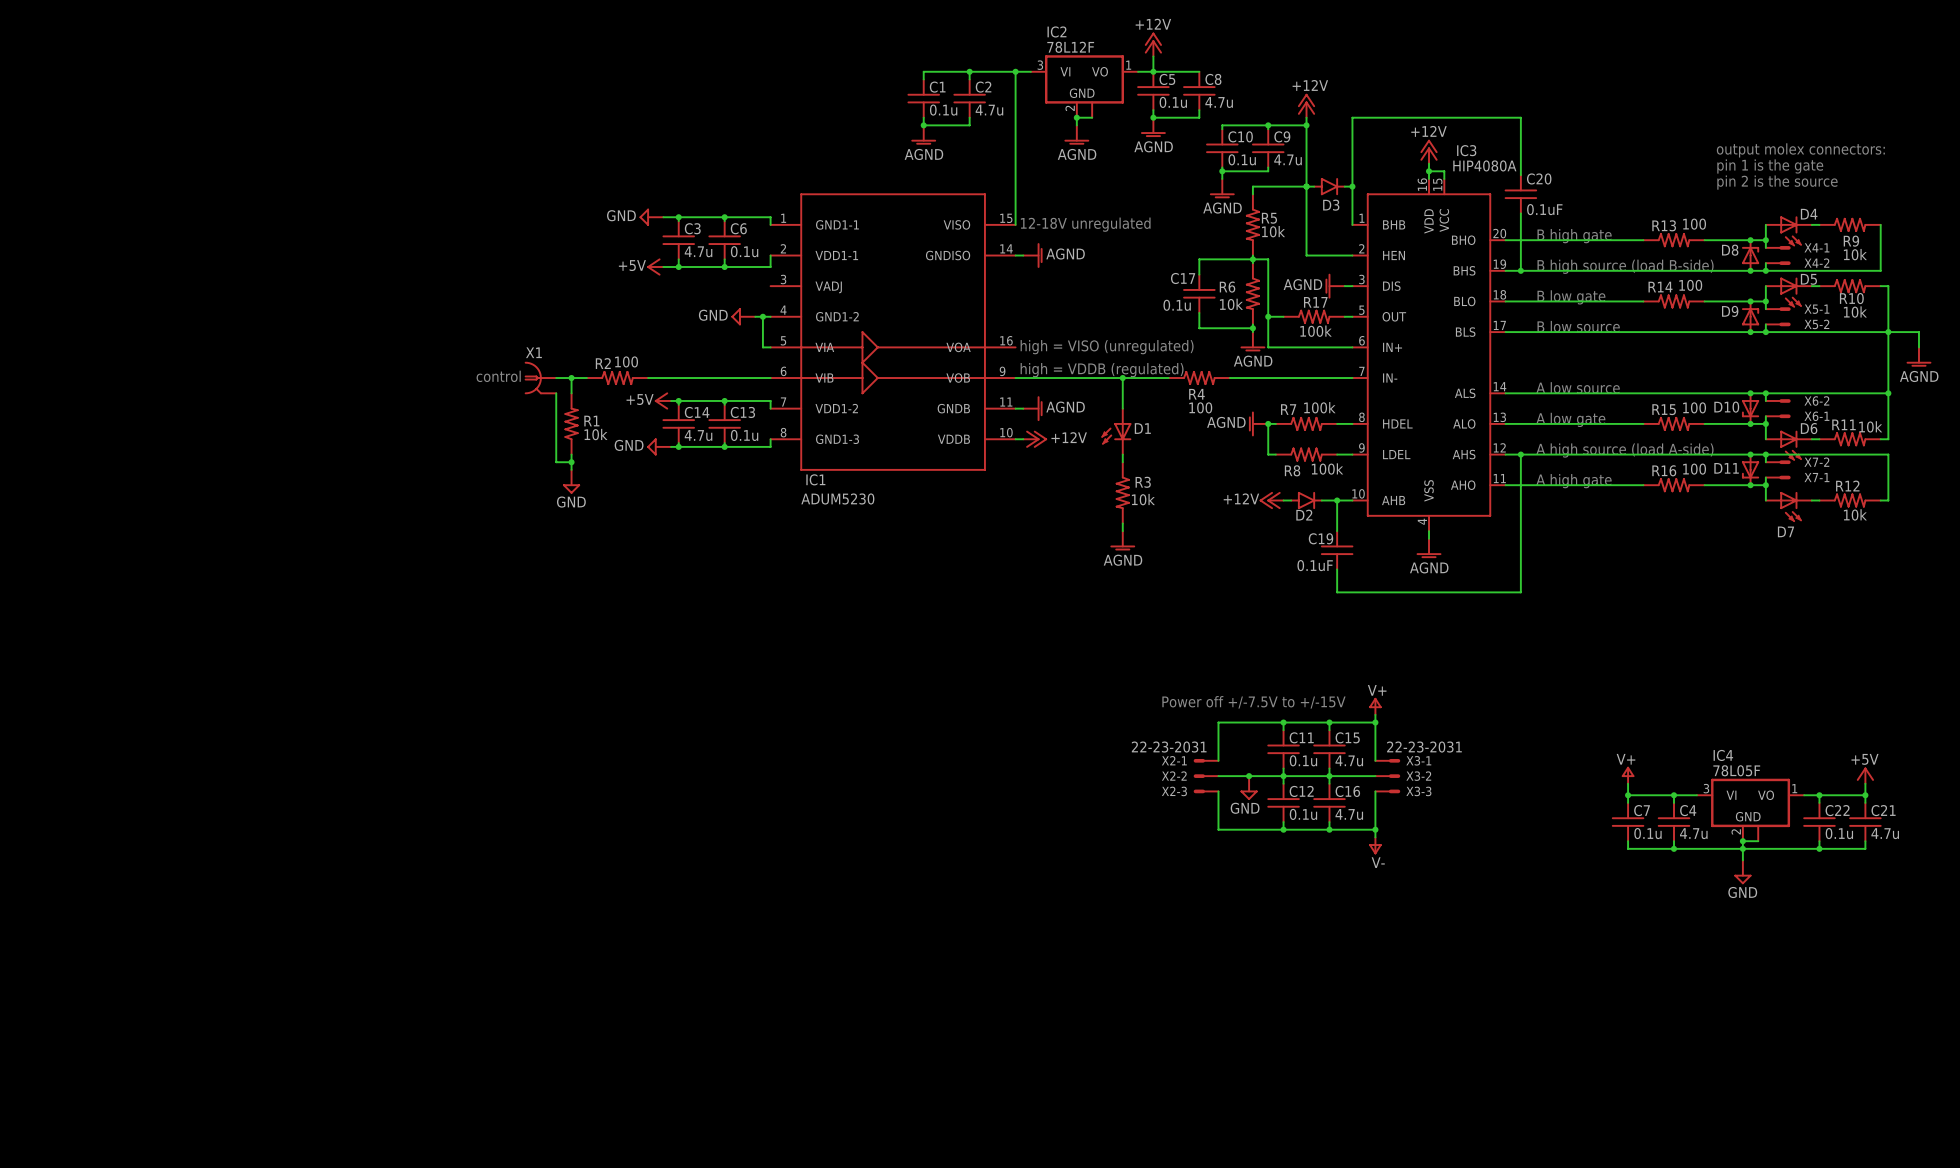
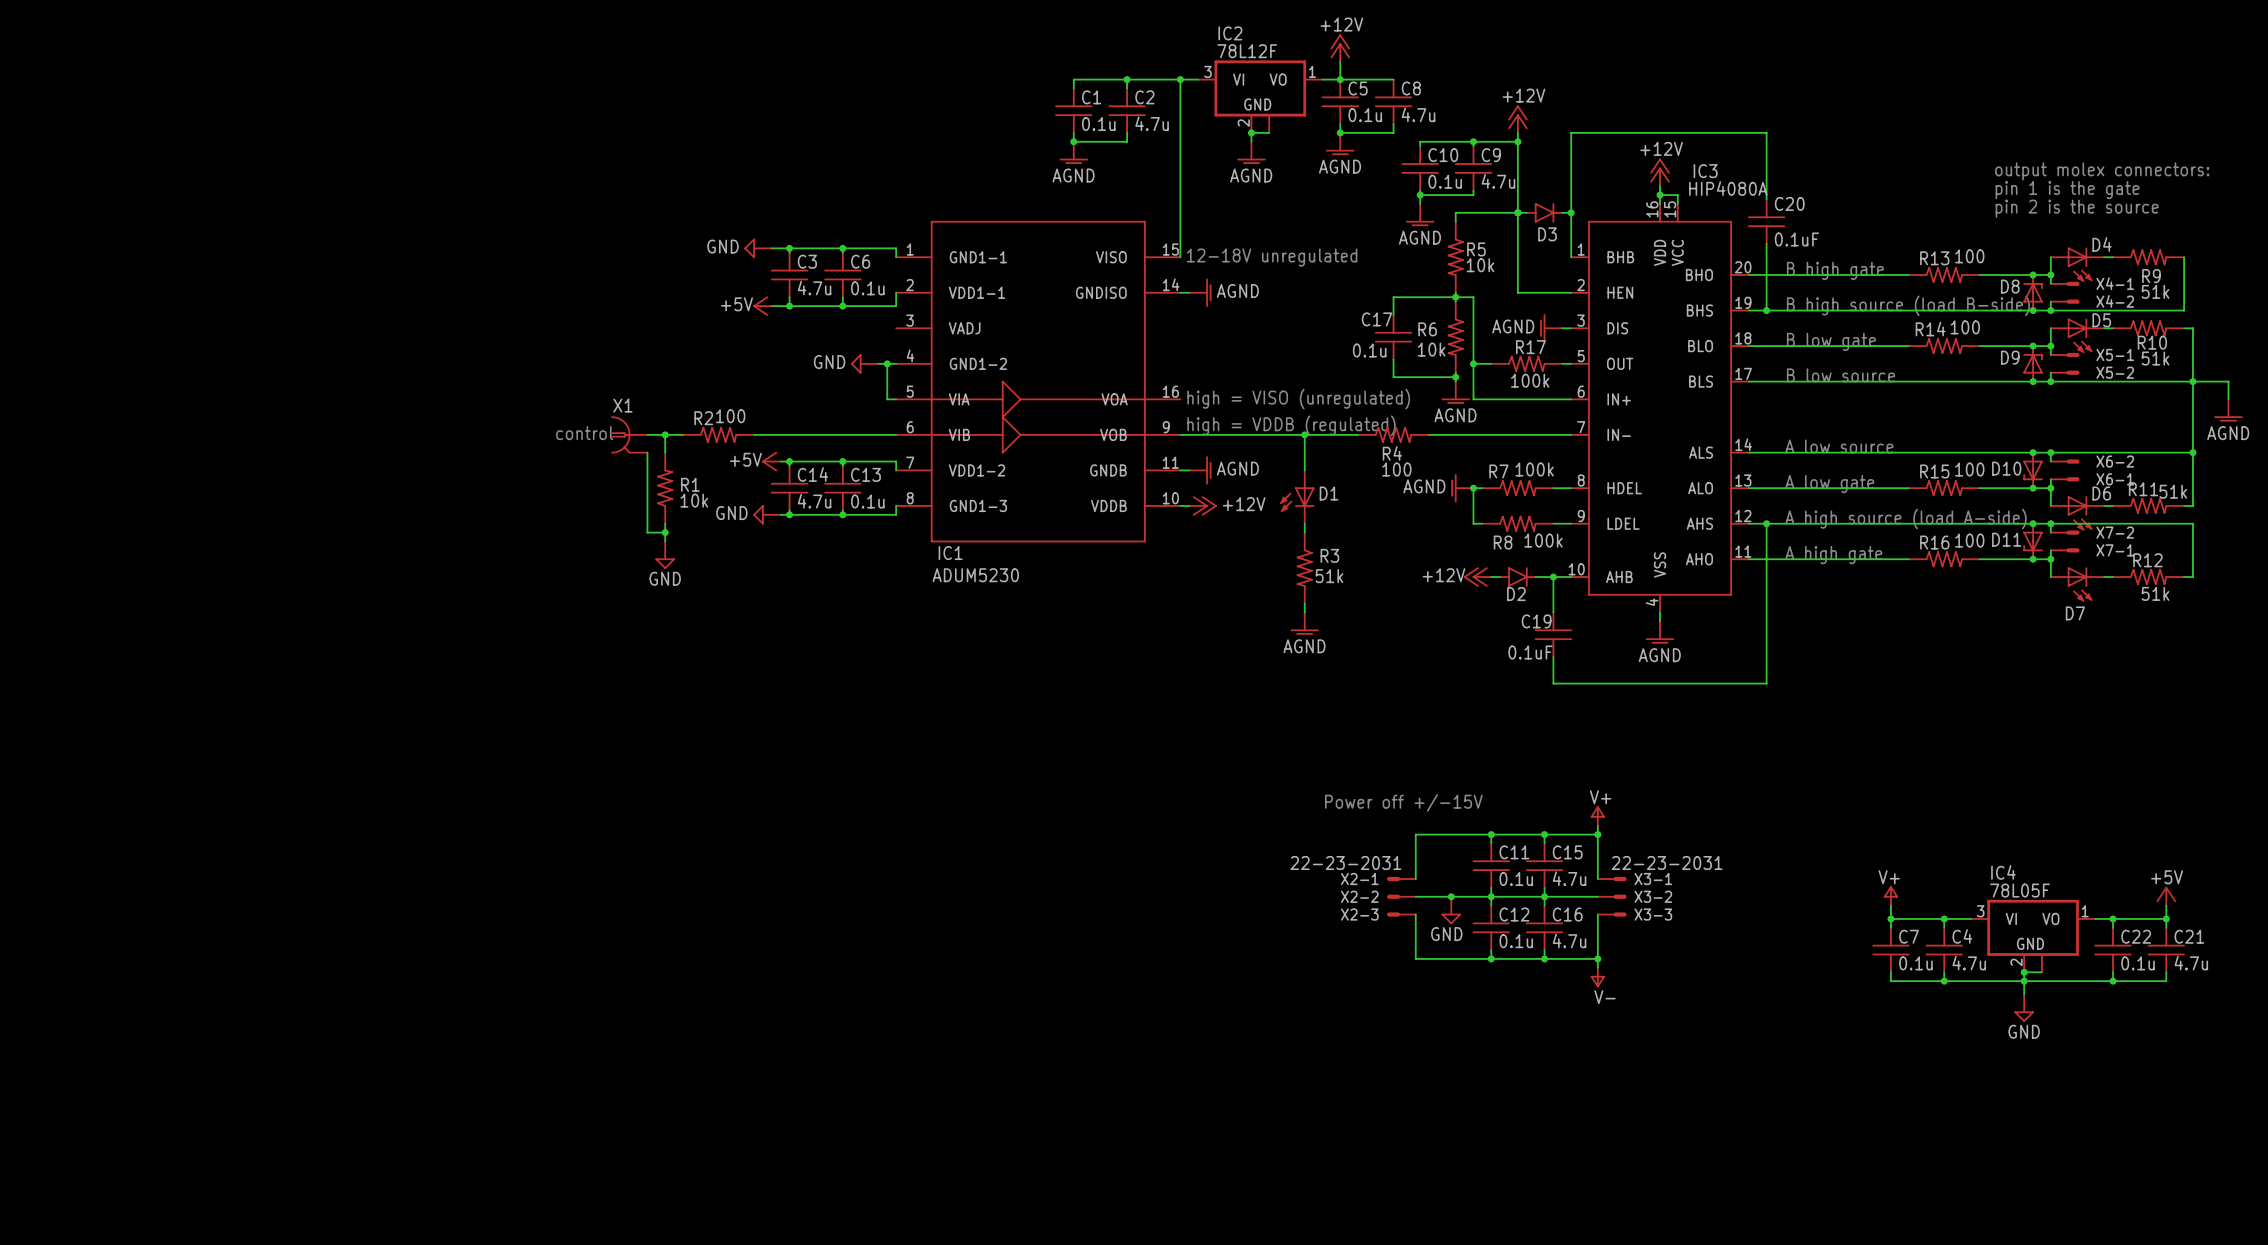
R9 value: 10k (1855, 254) -> 51k (2155, 291)
R10 value: 10k (1855, 312) -> 51k (2155, 358)
R11 value: 10k (1870, 426) -> 51k (2173, 491)
R3 value: 10k (1143, 499) -> 51k (1329, 576)
R12 value: 10k (1855, 514) -> 51k (2155, 593)
text: Power off +/-7.5V to +/-15V (1253, 702) -> Power off +/-15V (1403, 802)

